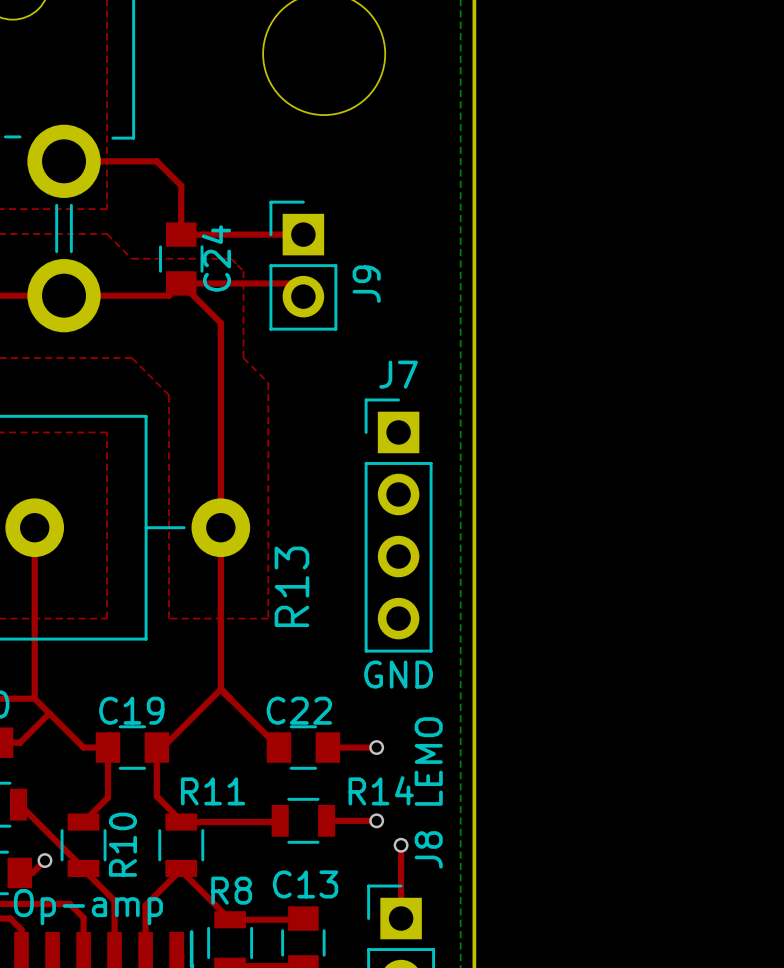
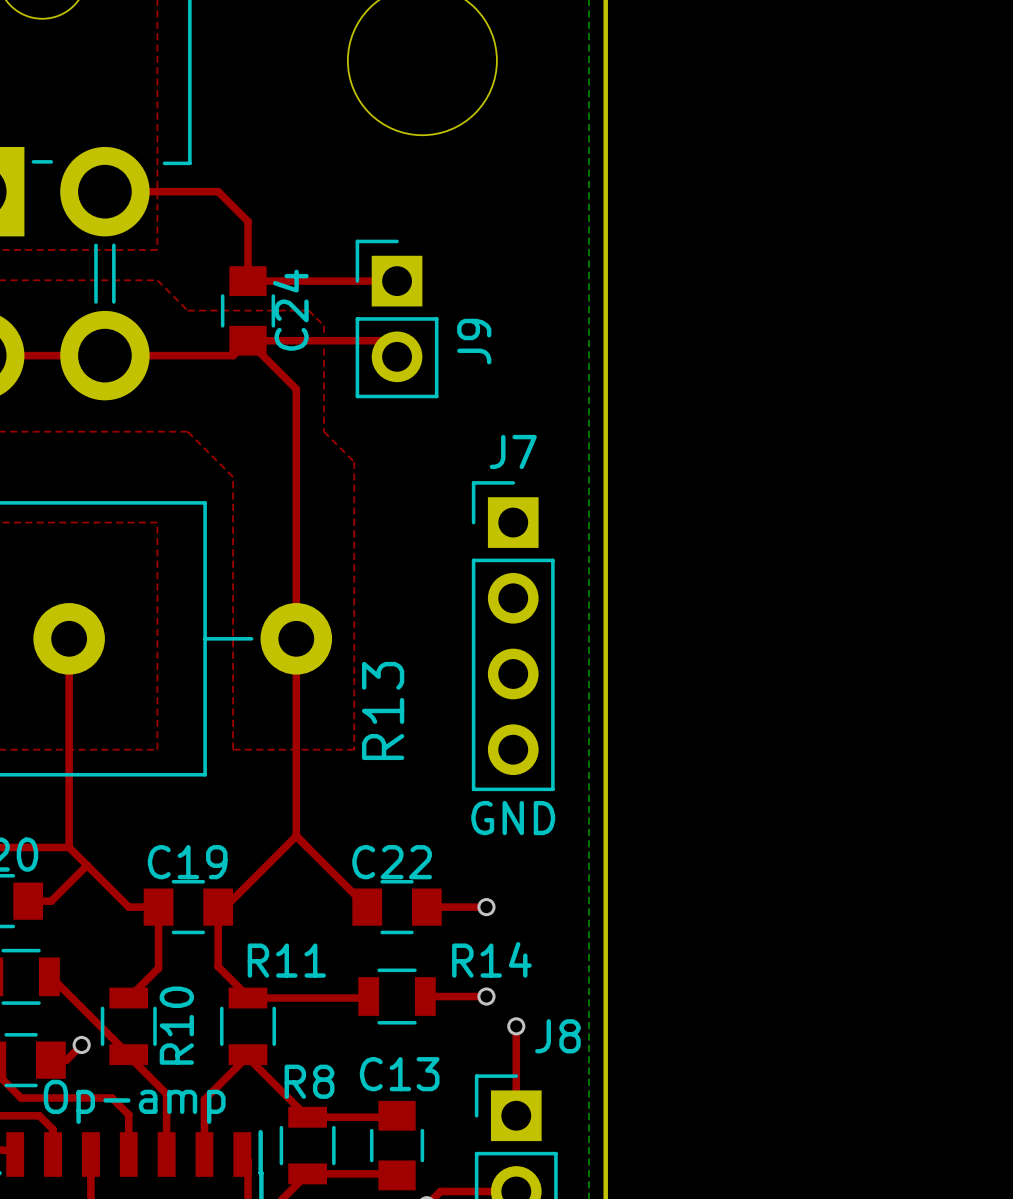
J8 LEMO name: J8 LEMO (428, 792) -> J8 (557, 1036)

